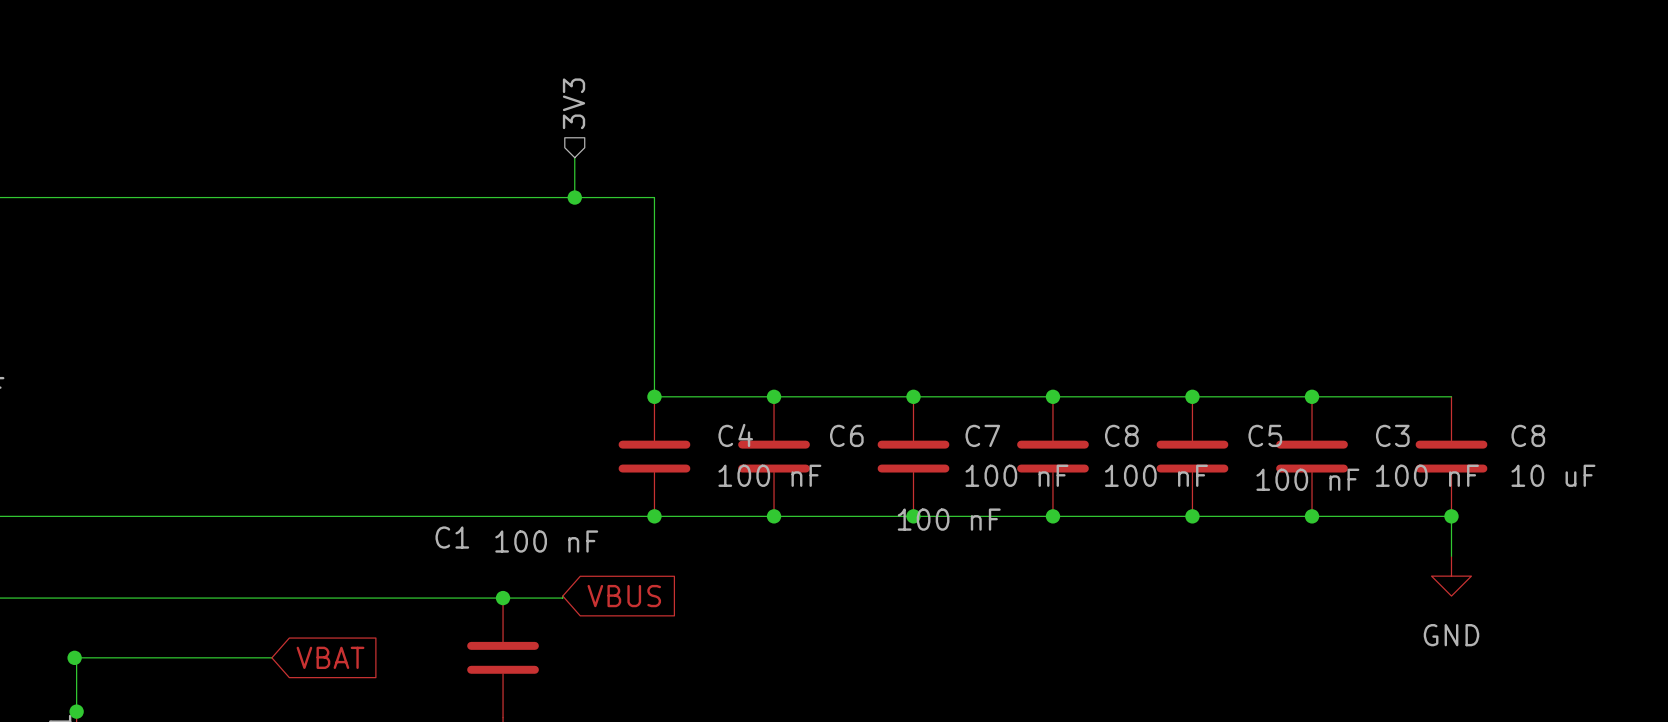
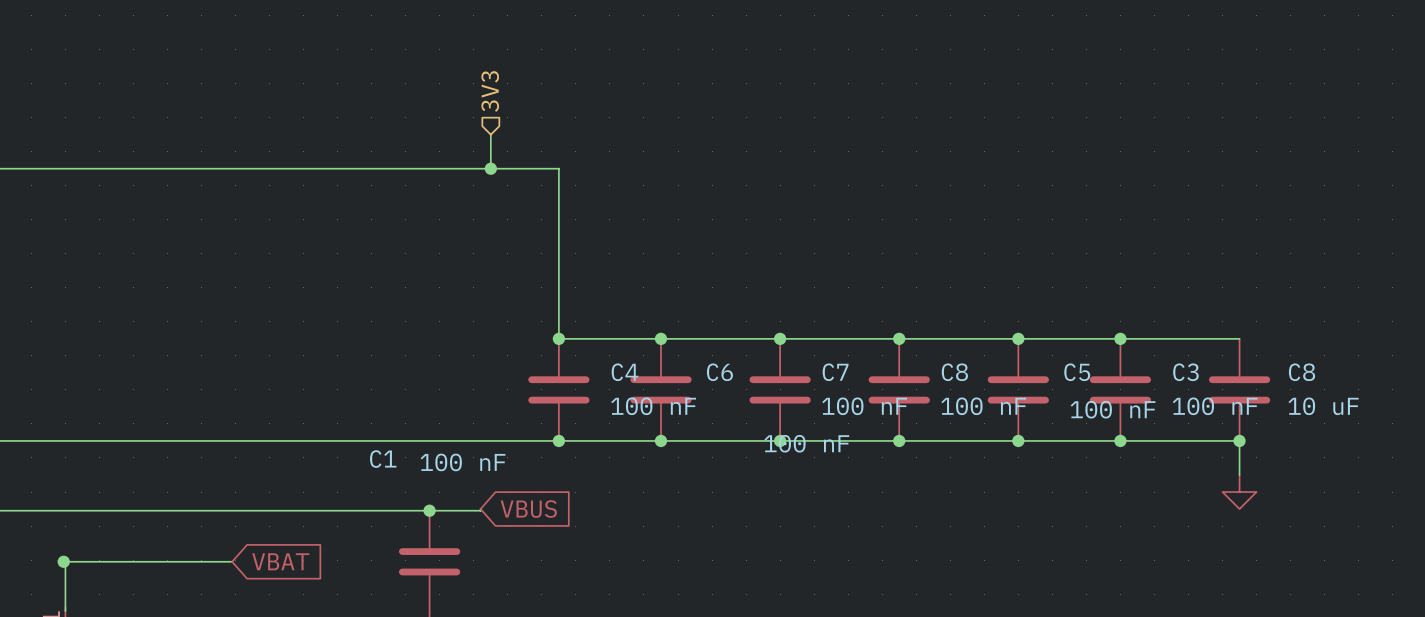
power symbol text: GND (1451, 635) -> none
junction: (76, 711) -> none

